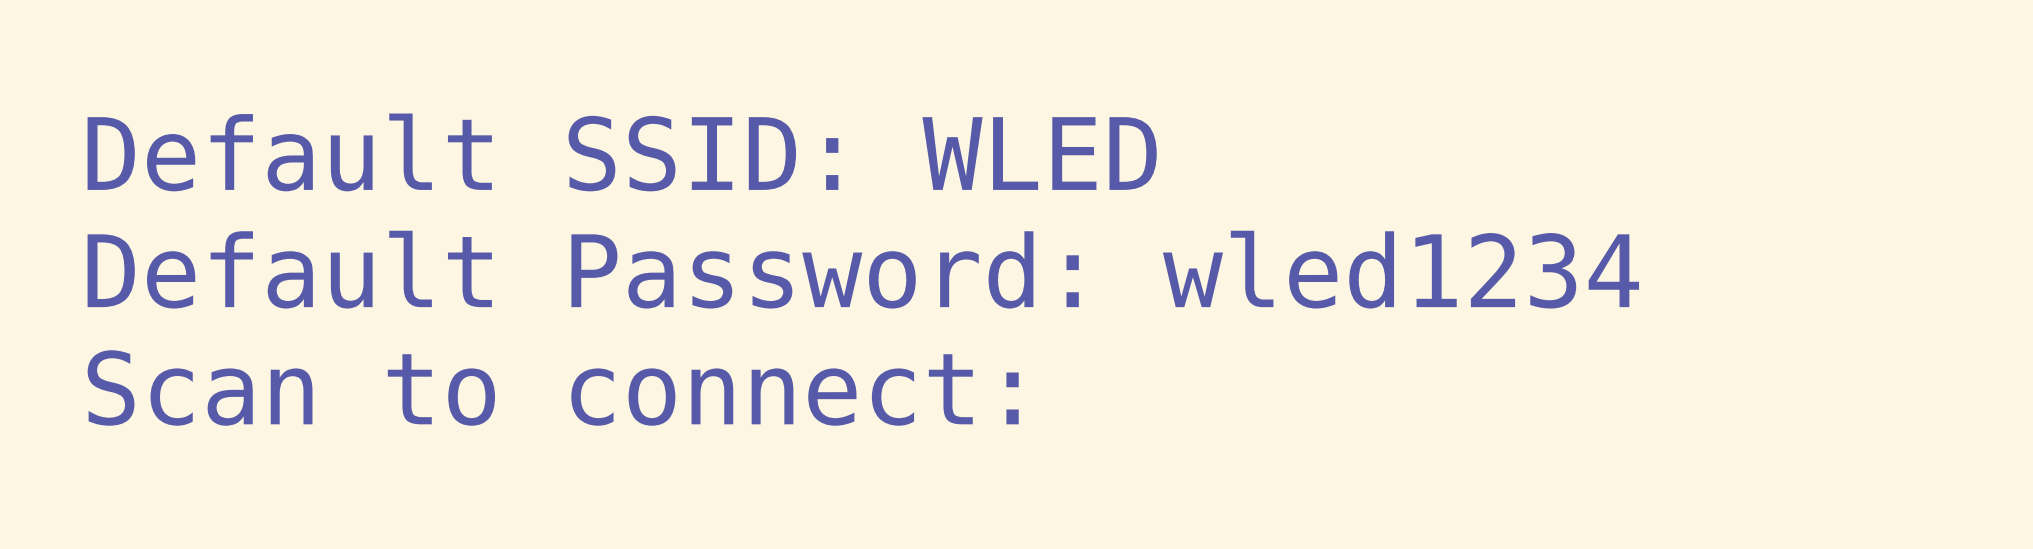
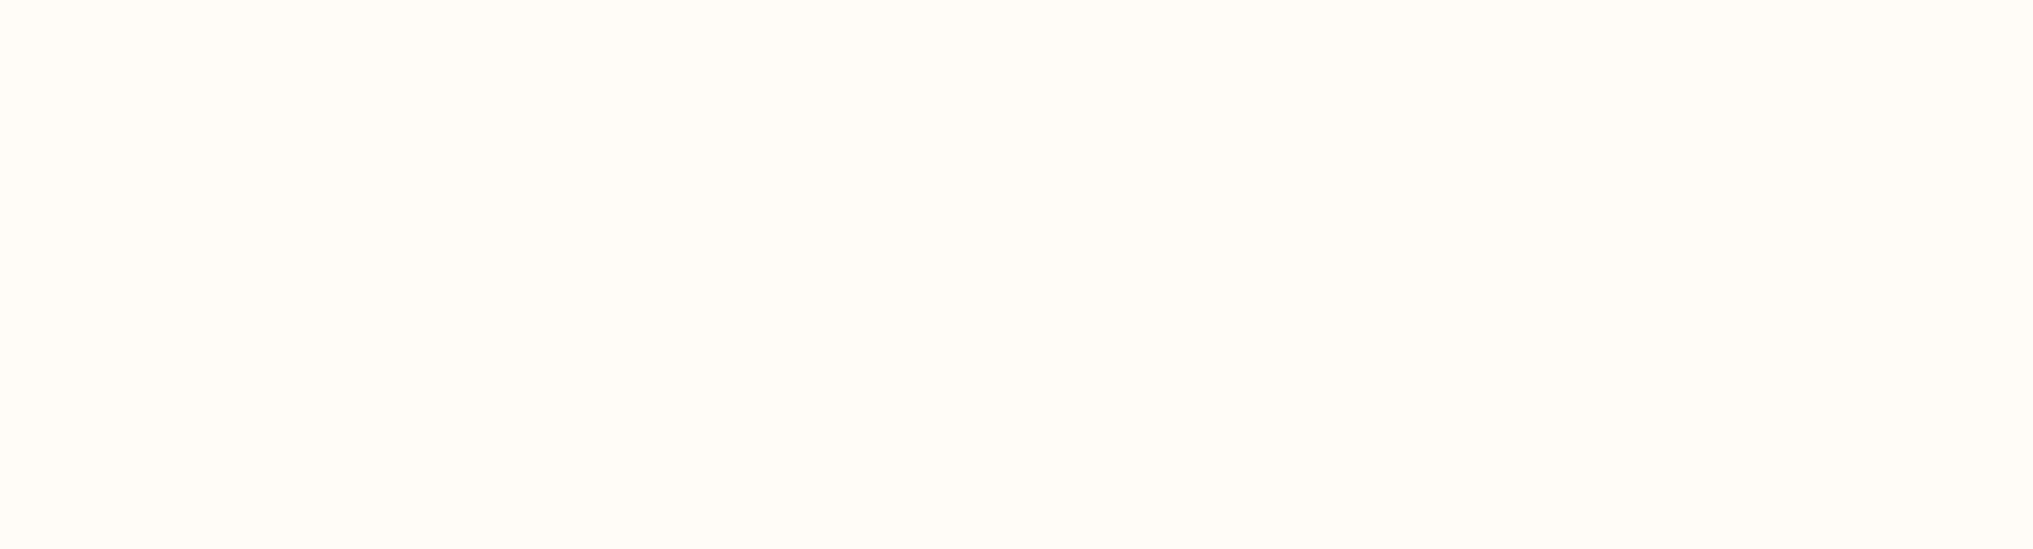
text: Default SSID: WLED (622, 152) -> none
text: Default Password: wled1234 (863, 269) -> none
text: Scan to connect: (553, 387) -> none

